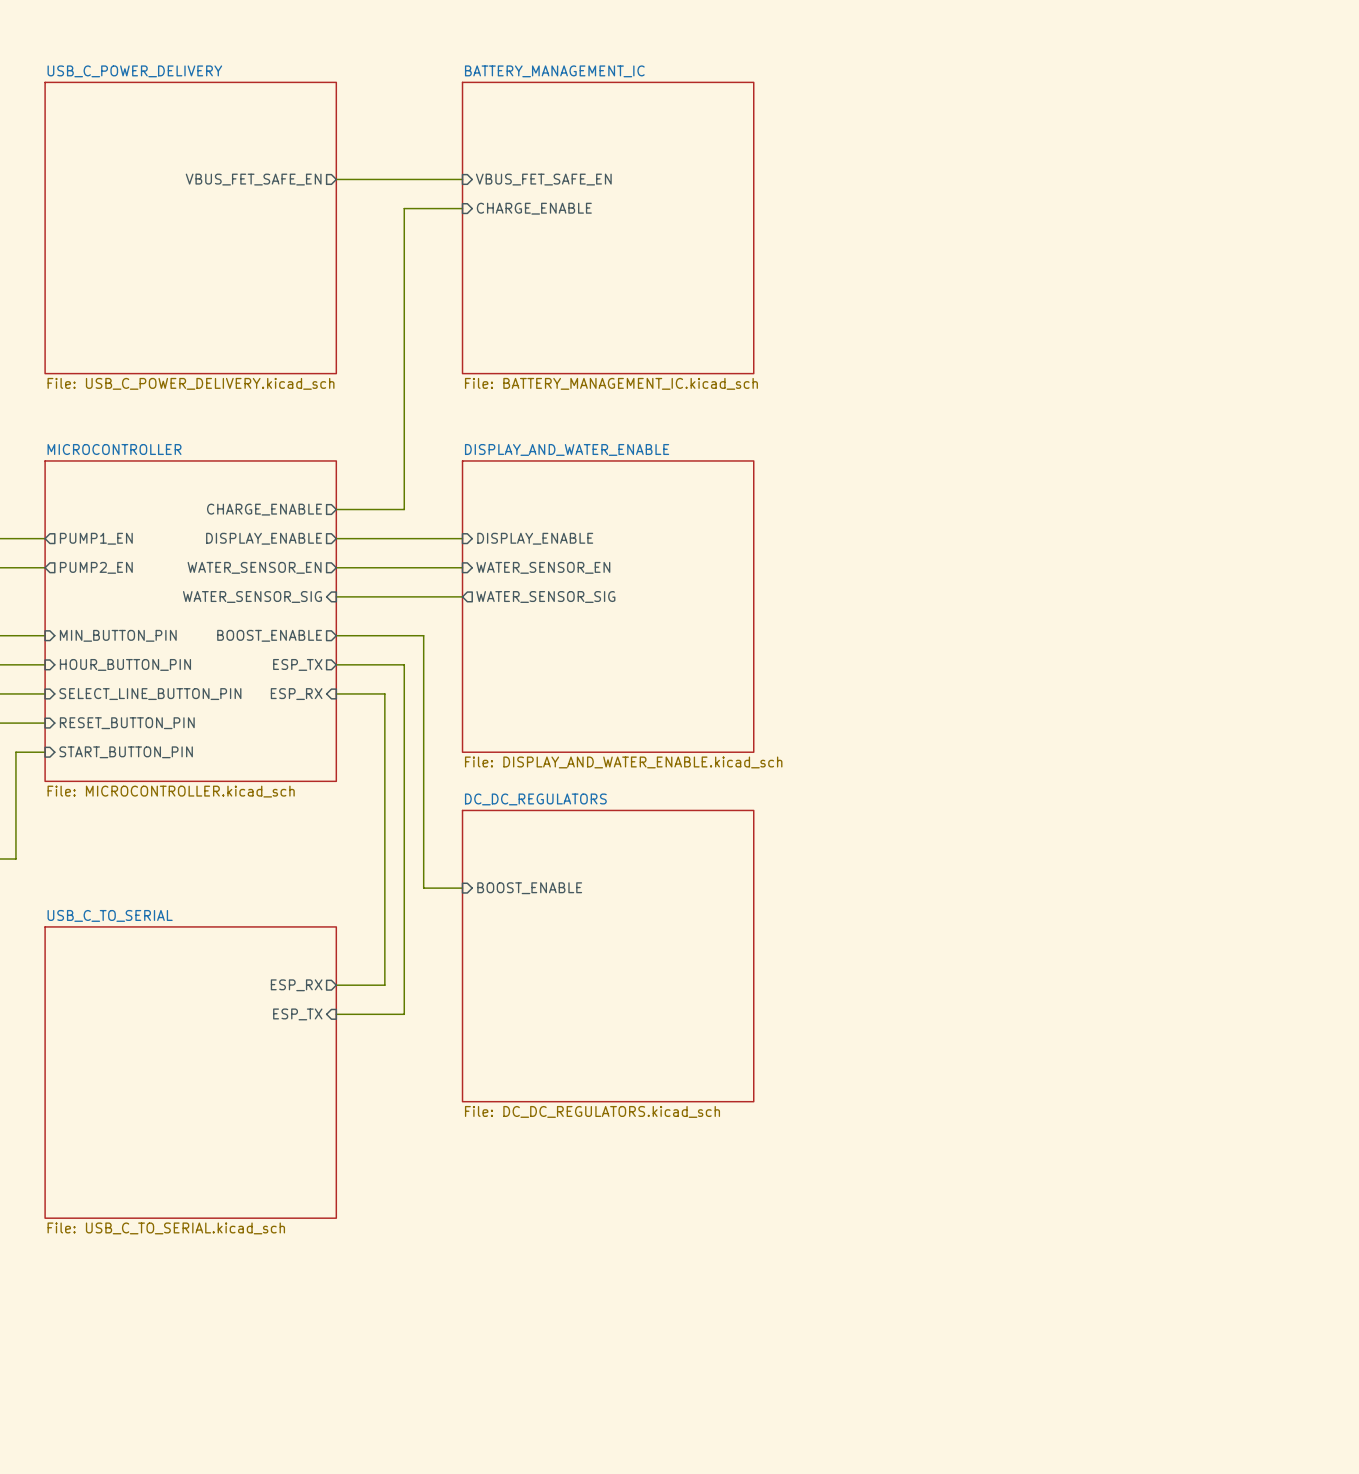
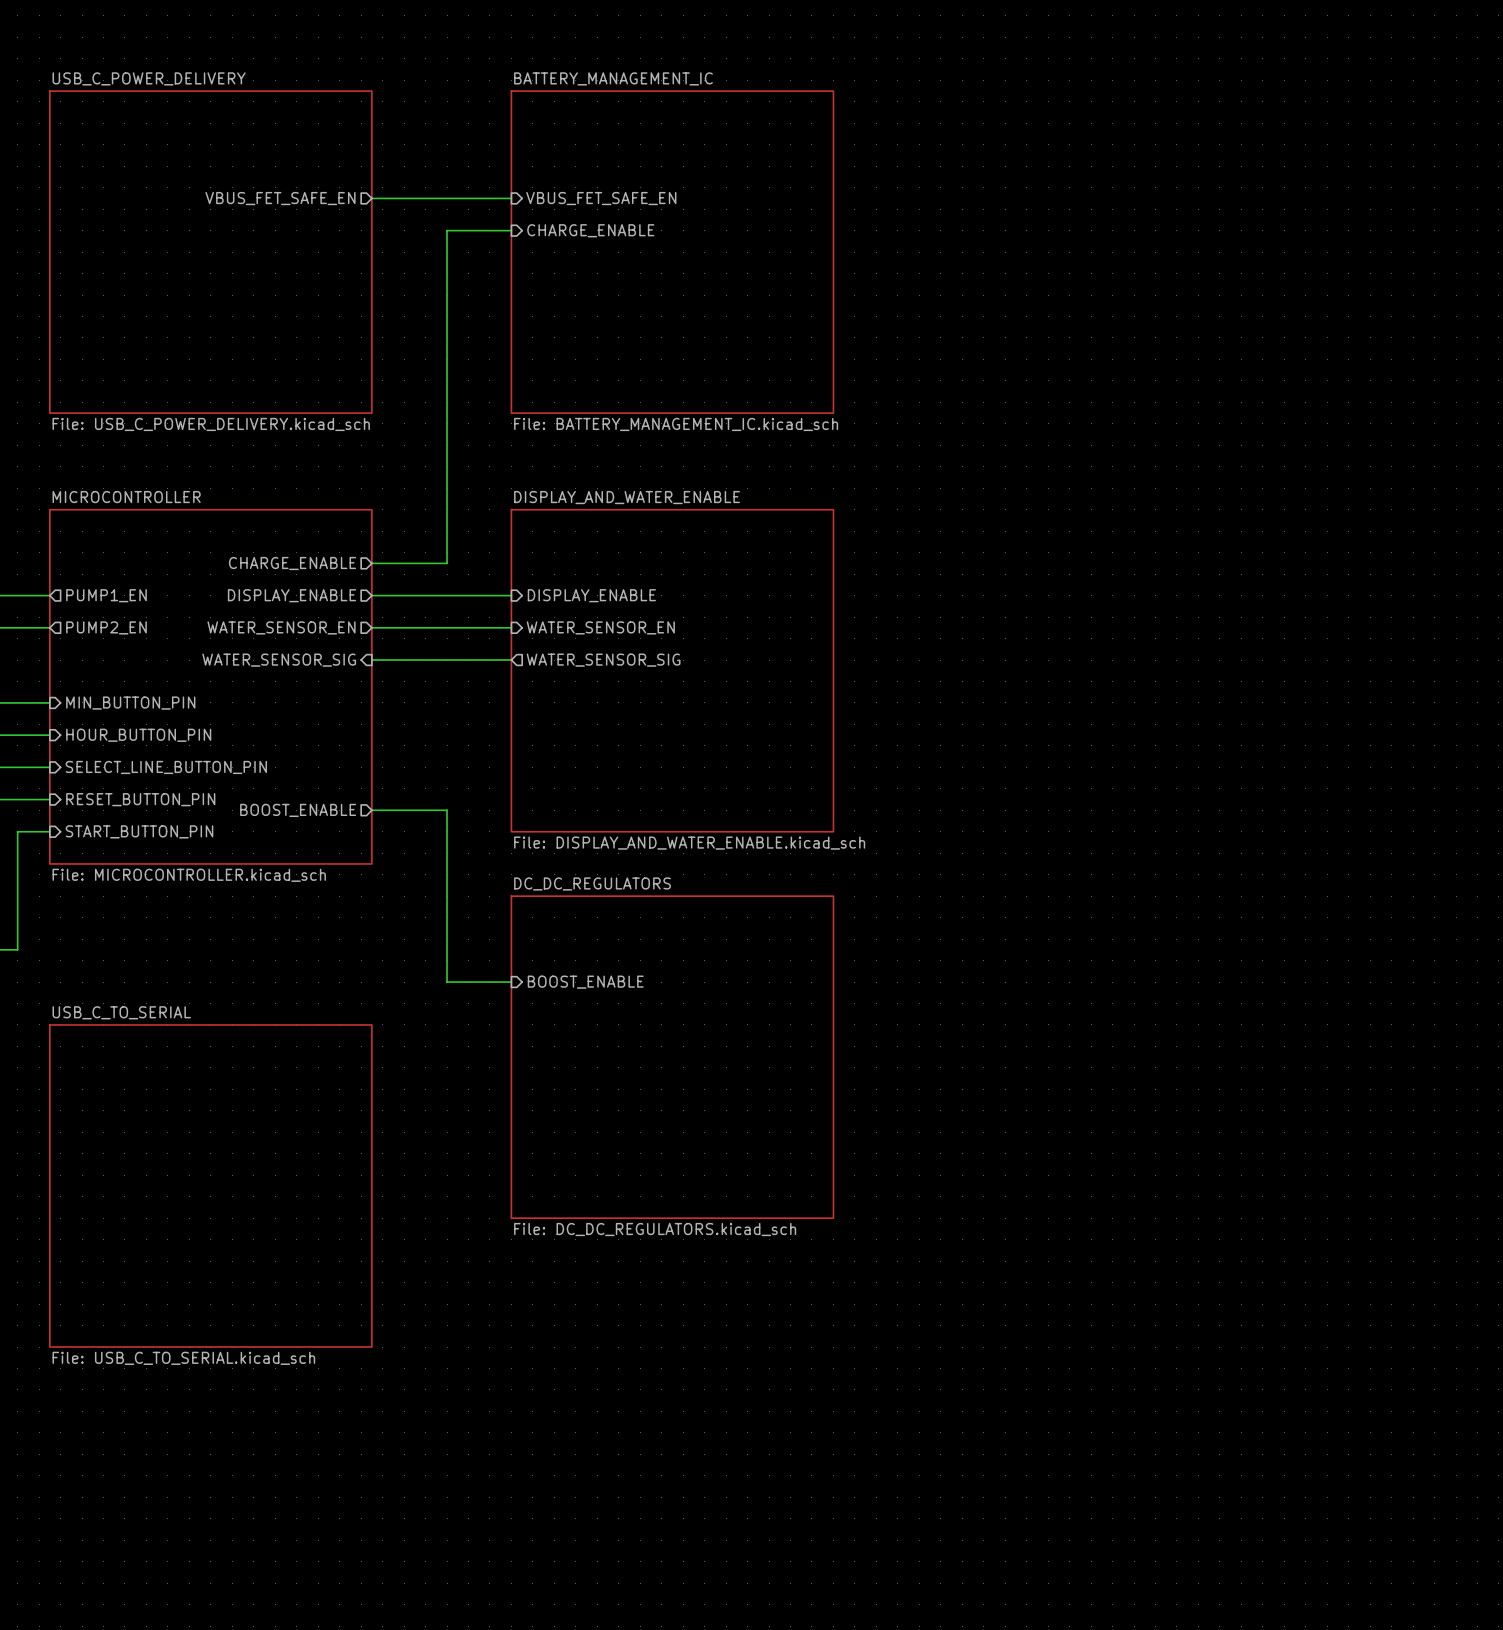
sheet pin position: BOOST_ENABLE (269, 635) -> BOOST_ENABLE (298, 810)
wire: (336, 635) (423, 635) (423, 888) -> none
sheet pin: ESP_TX (297, 664) -> none
wire: (336, 664) (404, 664) (404, 732) -> (371, 810) (447, 810)
wire: (336, 693) (384, 693) (384, 985) (336, 985) -> none
sheet pin: ESP_RX (296, 694) -> none
wire: (404, 888) (404, 1014) (336, 1014) -> (447, 982) (468, 982)
sheet pin: ESP_RX (296, 985) -> none
sheet pin: ESP_TX (297, 1014) -> none

